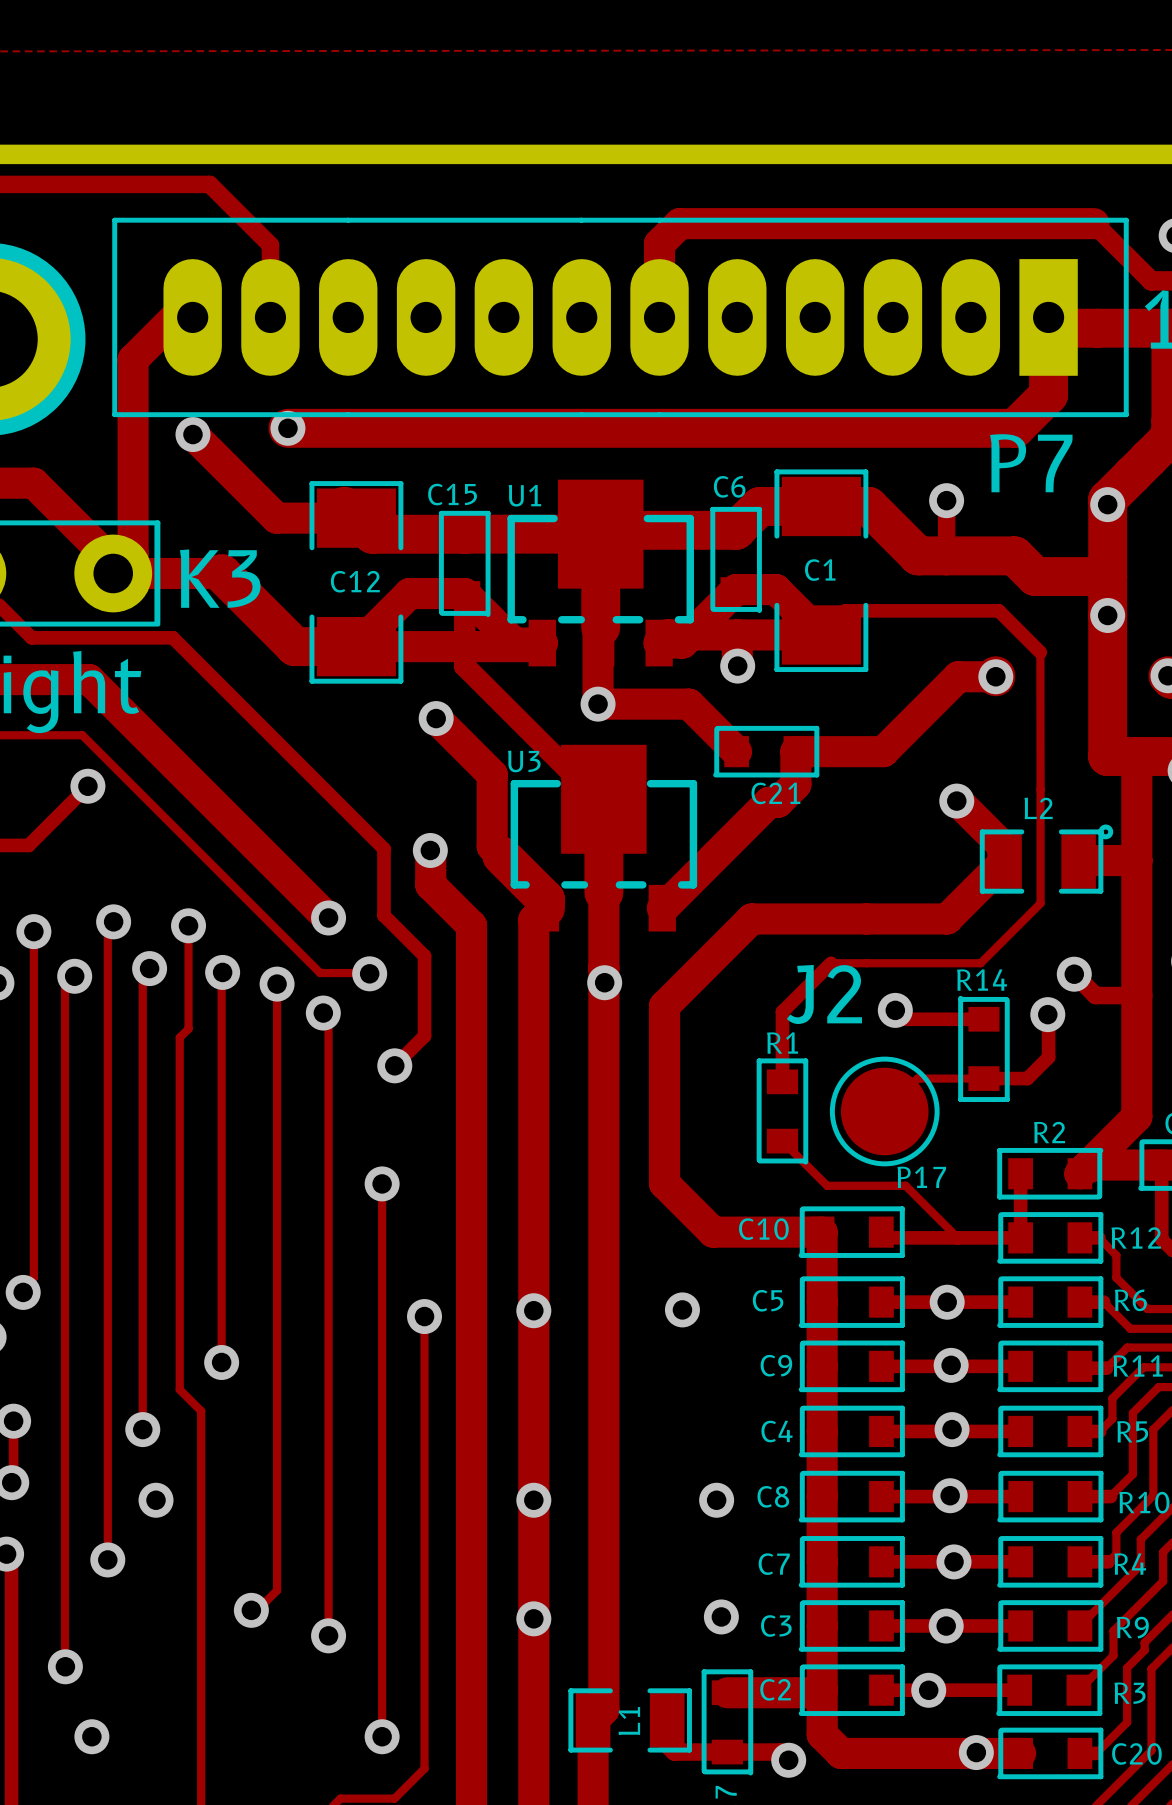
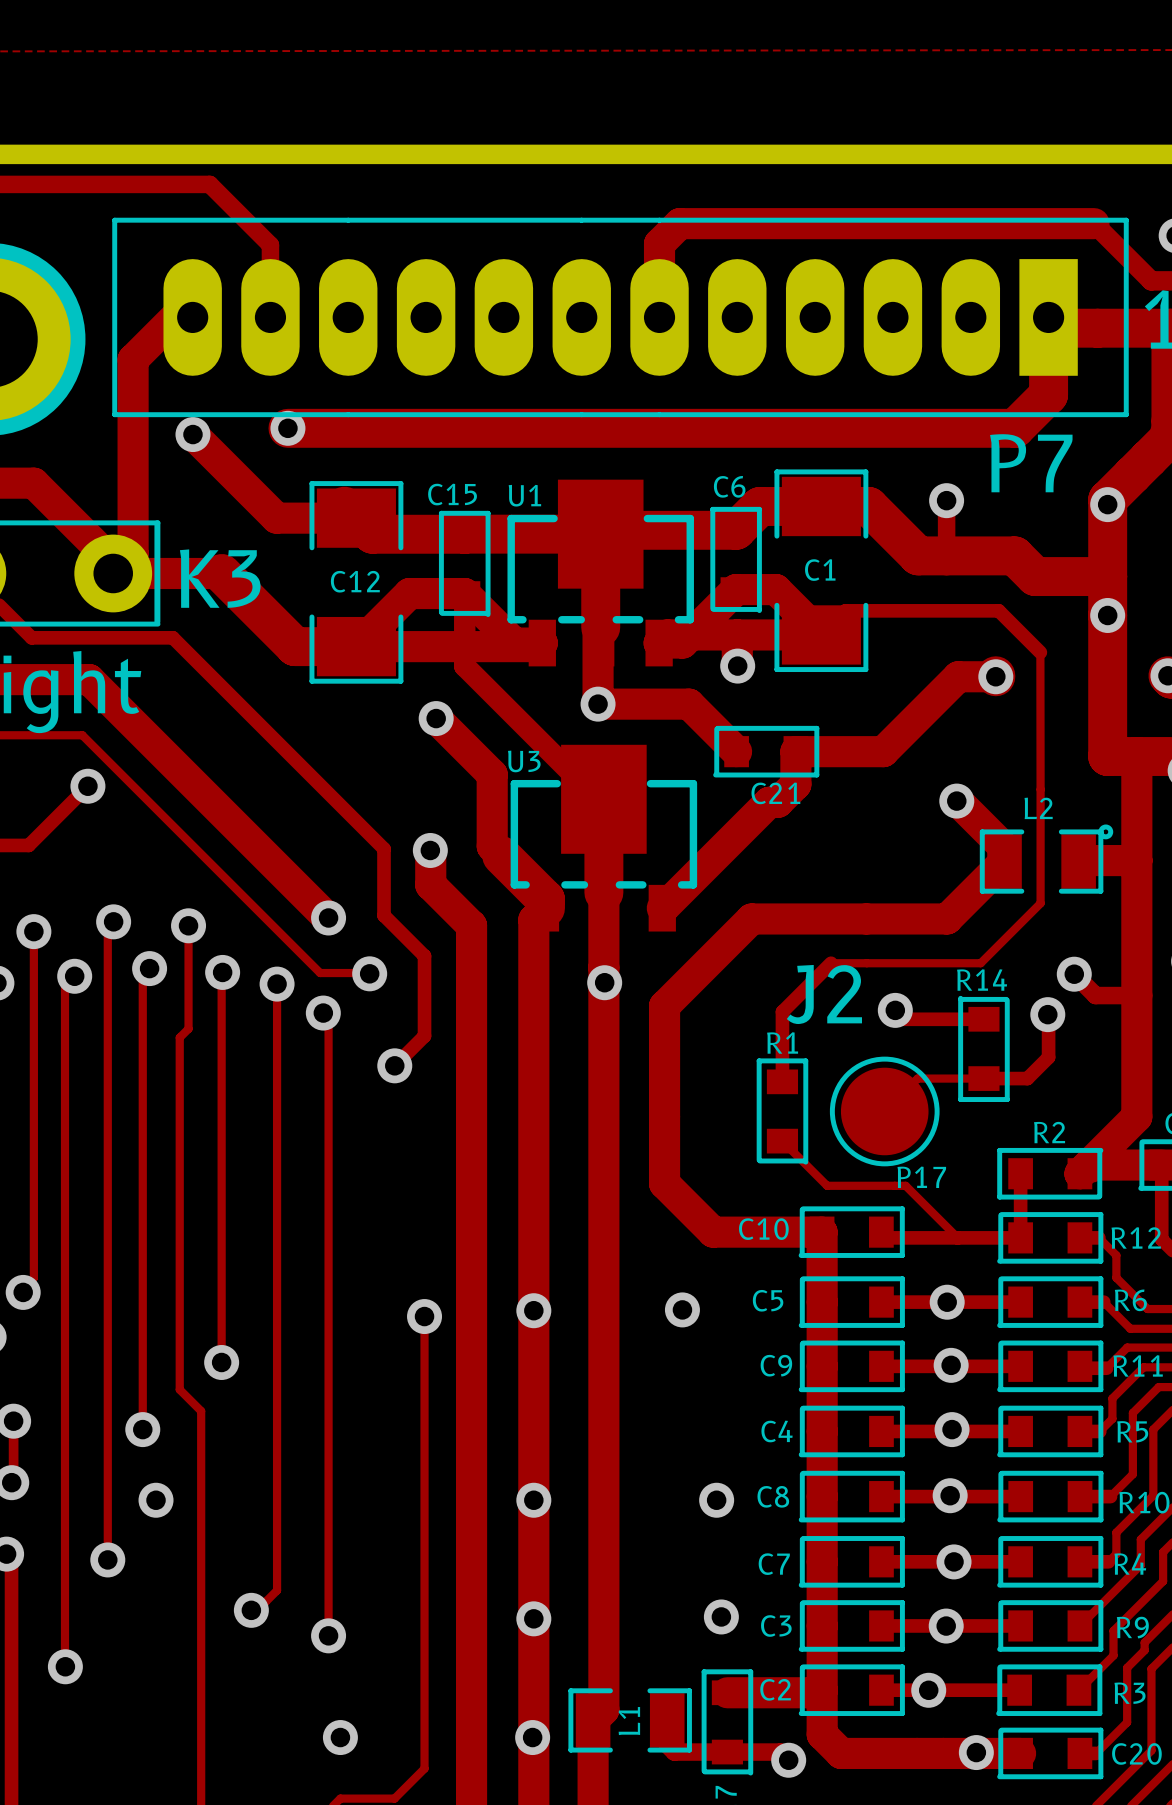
track: (382, 1183) (382, 1736) -> none
via: (382, 1183) -> none
via: (91, 1736) -> none
via position: (382, 1736) -> (340, 1737)
via: none -> (532, 1737)

